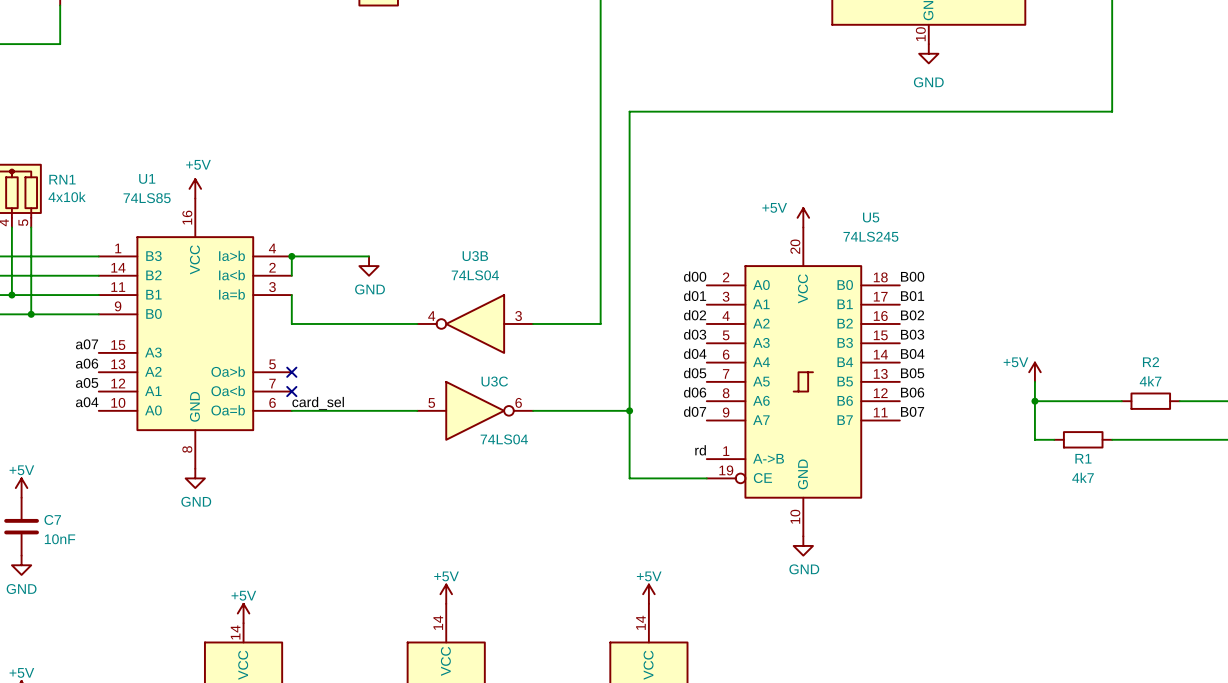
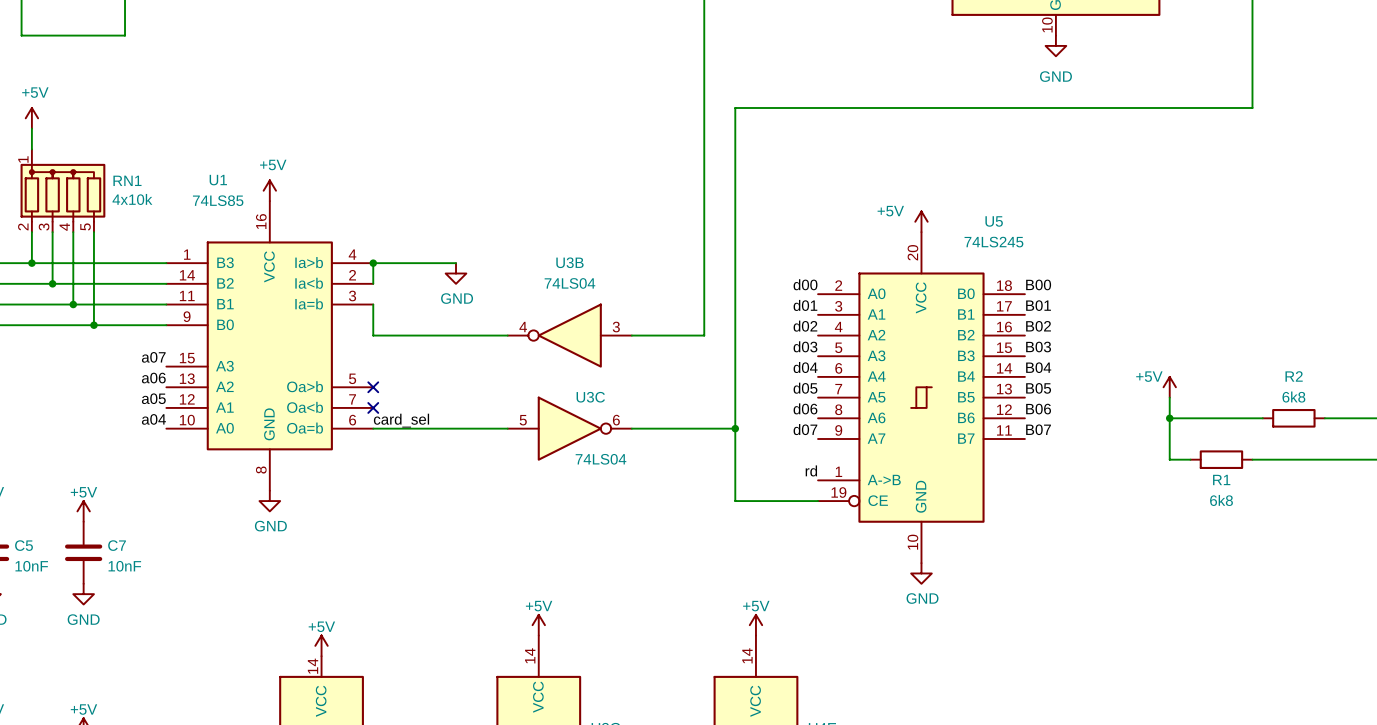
R2 value: 4k7 (1150, 381) -> 6k8 (1293, 397)
R1 value: 4k7 (1083, 477) -> 6k8 (1221, 500)

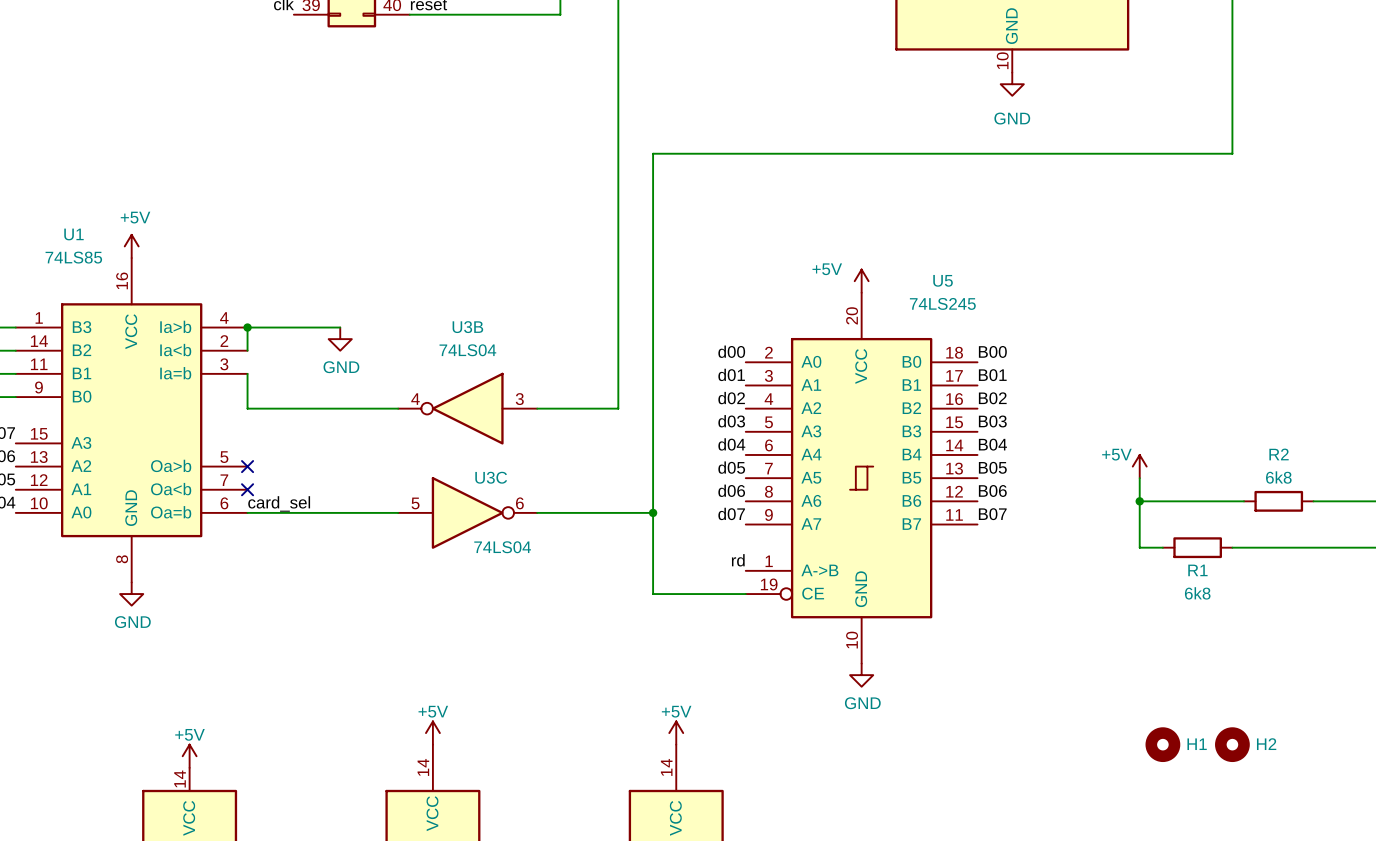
H1: none -> (1162, 744)
H2: none -> (1232, 744)

